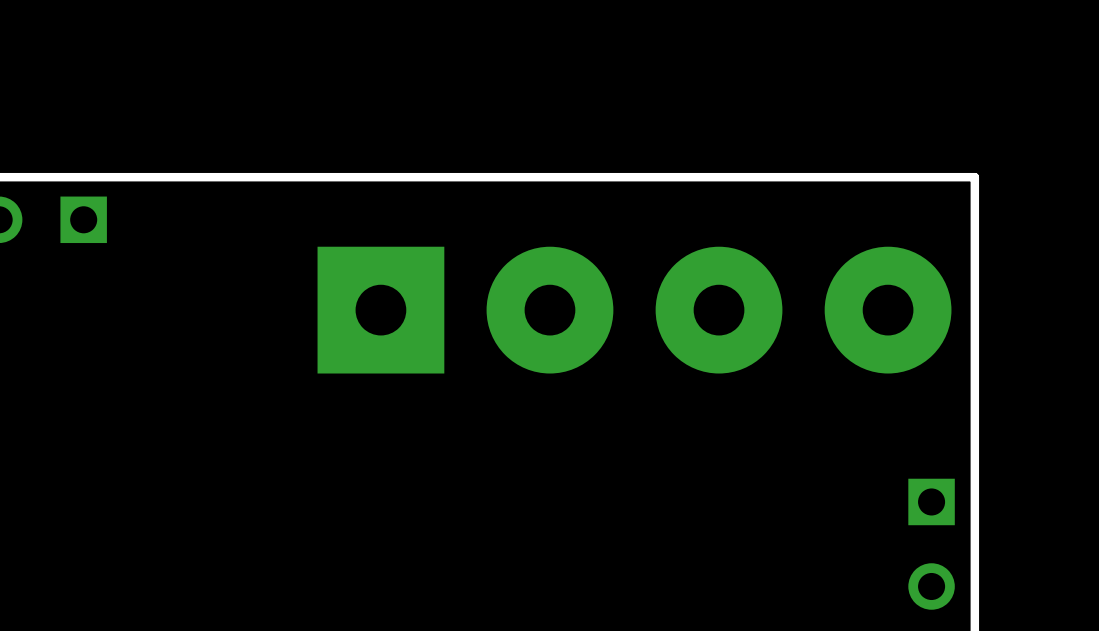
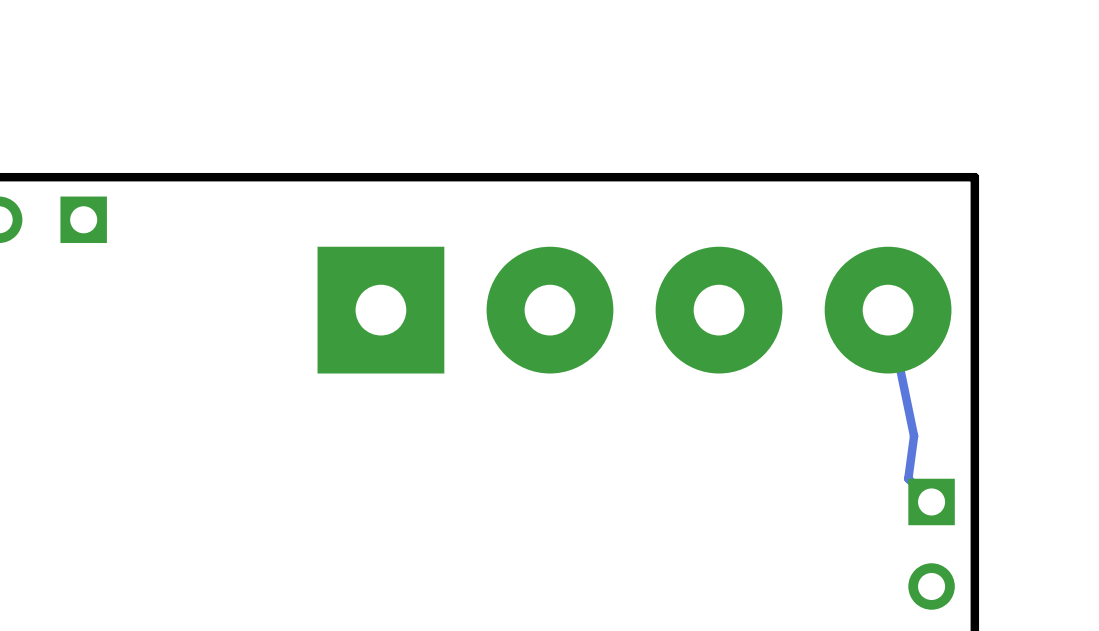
track: none -> (888, 310) (914, 436) (908, 478) (931, 501)

